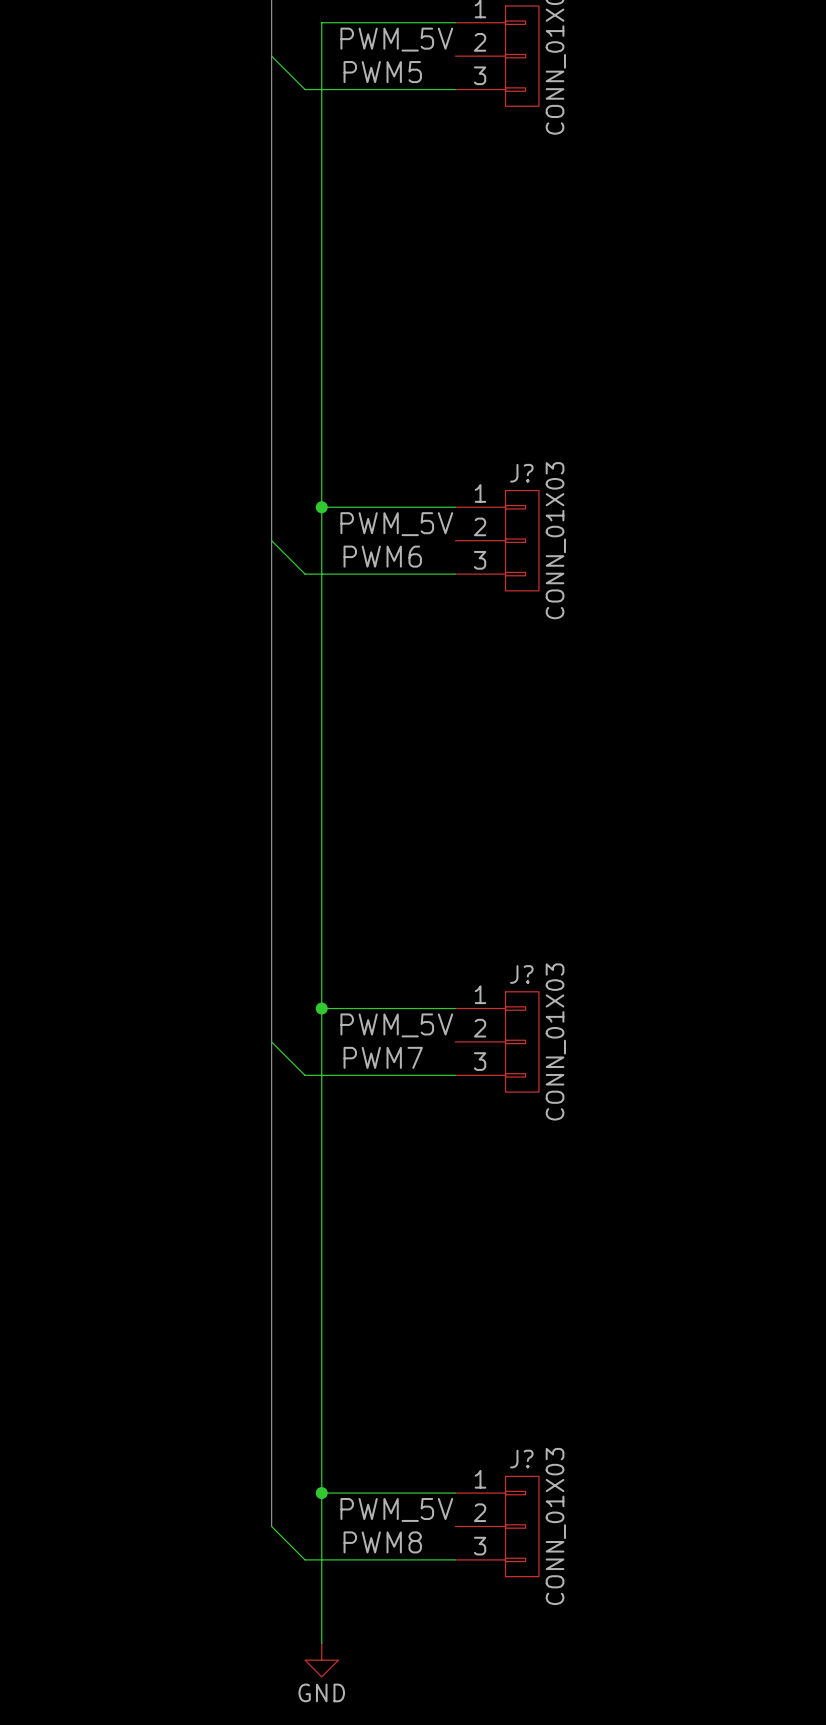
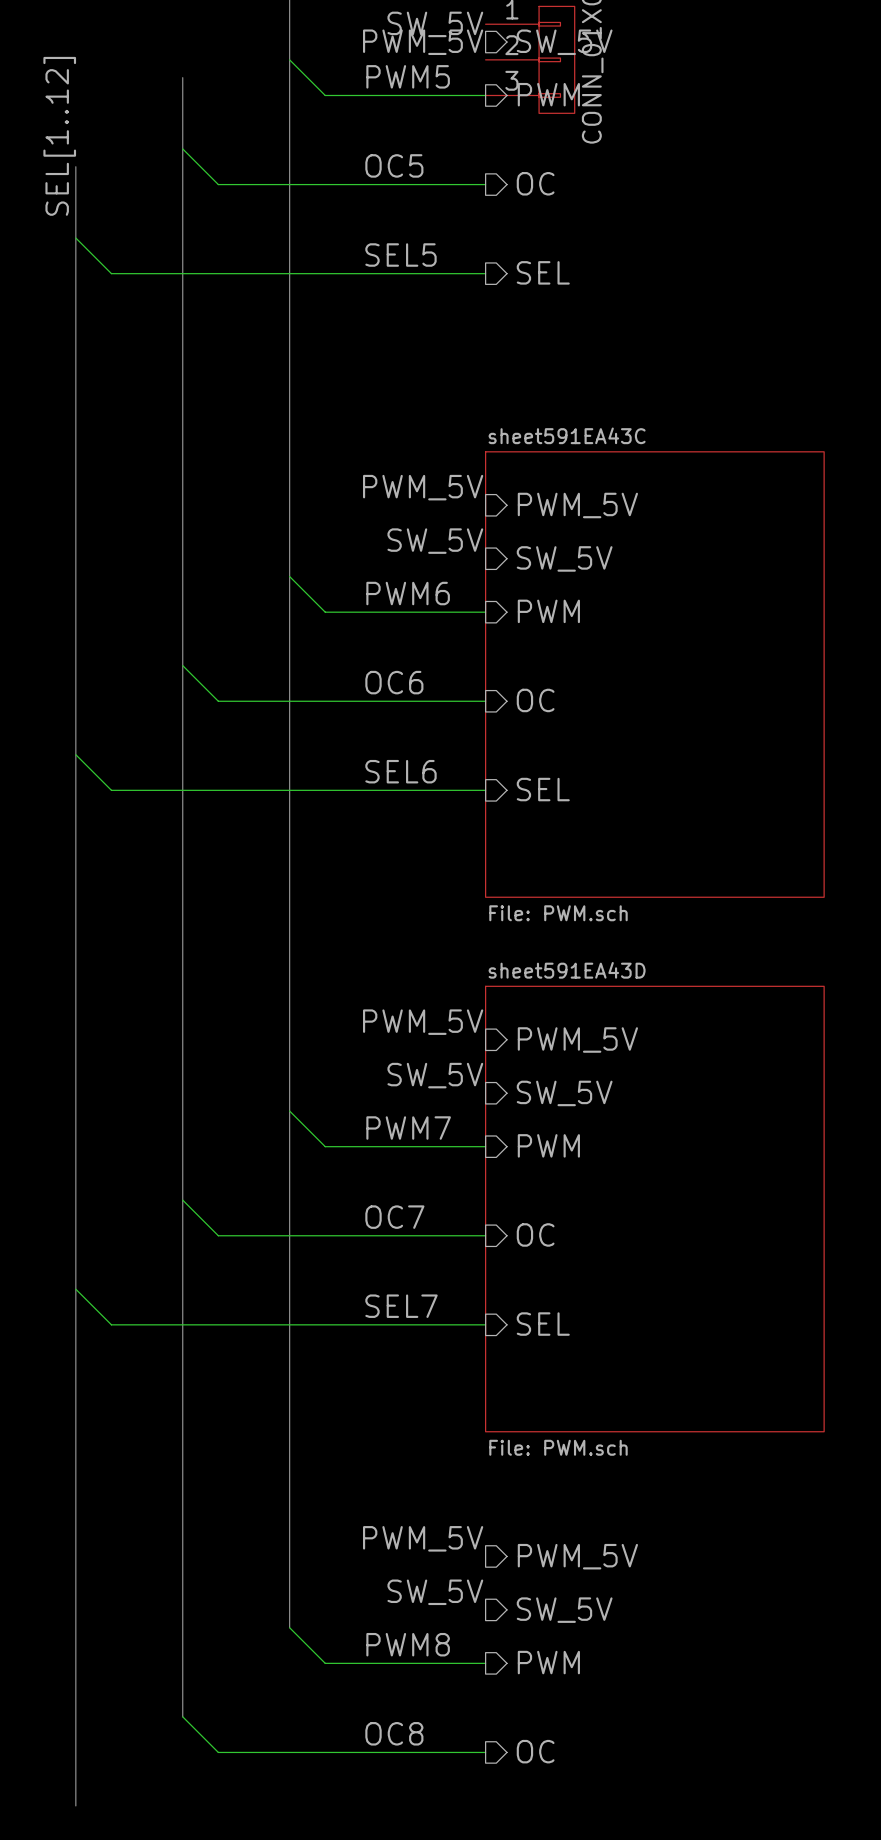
label: none -> SW_5V (435, 24)
wire: (455, 22) (321, 22) (321, 1643) -> none
sheet pin: none -> SW_5V (564, 42)
bus: none -> (182, 77) (182, 1716)
sheet pin: none -> PWM (548, 94)
label: none -> SEL[1..12] (59, 136)
wire: none -> (182, 148) (218, 184) (485, 184)
label: none -> OC5 (394, 165)
bus: none -> (75, 166) (75, 1805)
sheet pin: none -> OC (535, 183)
wire: none -> (75, 238) (111, 273) (485, 273)
label: none -> SEL5 (400, 255)
sheet pin: none -> SEL (543, 272)
sheet pin: none -> PWM_5V (577, 505)
wire: (321, 507) (455, 507) -> none
junction: (321, 507) -> none
label: none -> SW_5V (435, 541)
label position: PWM_5V (396, 524) -> PWM_5V (423, 487)
sheet pin: none -> SW_5V (564, 558)
J?: CONN_01X03 (497, 540) -> none
sheet pin: none -> PWM (548, 611)
wire: none -> (182, 665) (218, 701) (485, 701)
sheet sheet591EA43C: none -> File: PWM.sch (654, 674)
label: none -> OC6 (394, 682)
sheet pin: none -> OC (535, 700)
wire: none -> (75, 754) (111, 790) (485, 790)
label: none -> SEL6 (400, 771)
sheet pin: none -> SEL (543, 789)
sheet pin: none -> PWM_5V (577, 1040)
wire: (321, 1008) (455, 1008) -> none
junction: (321, 1008) -> none
label: none -> SW_5V (435, 1075)
label position: PWM_5V (396, 1025) -> PWM_5V (423, 1022)
sheet pin: none -> SW_5V (564, 1093)
J?: CONN_01X03 (497, 1041) -> none
sheet pin: none -> PWM (548, 1145)
wire: none -> (182, 1200) (218, 1235) (485, 1235)
sheet sheet591EA43D: none -> File: PWM.sch (654, 1209)
label: none -> OC7 (394, 1217)
sheet pin: none -> OC (535, 1234)
wire: none -> (75, 1289) (111, 1324) (485, 1324)
label: none -> SEL7 (401, 1306)
sheet pin: none -> SEL (543, 1324)
sheet pin: none -> PWM_5V (577, 1556)
wire: (321, 1493) (455, 1493) -> none
junction: (321, 1493) -> none
label: none -> SW_5V (435, 1592)
label position: PWM_5V (396, 1509) -> PWM_5V (423, 1538)
sheet pin: none -> SW_5V (564, 1610)
J?: CONN_01X03 (497, 1526) -> none
sheet pin: none -> PWM (548, 1662)
wire: none -> (182, 1716) (218, 1752) (485, 1752)
label: none -> OC8 (394, 1733)
sheet pin: none -> OC (535, 1751)
power symbol: GND (321, 1660) -> none

